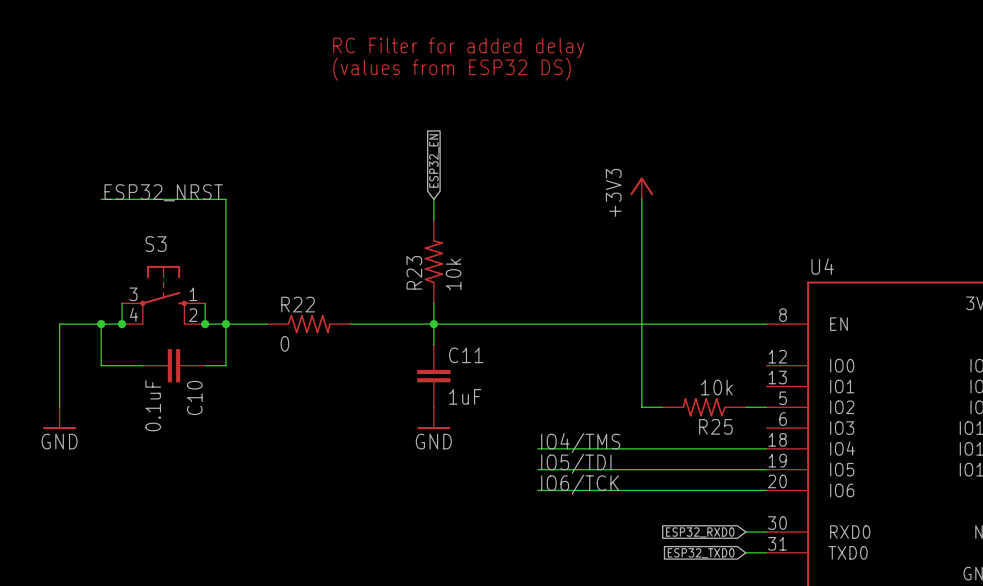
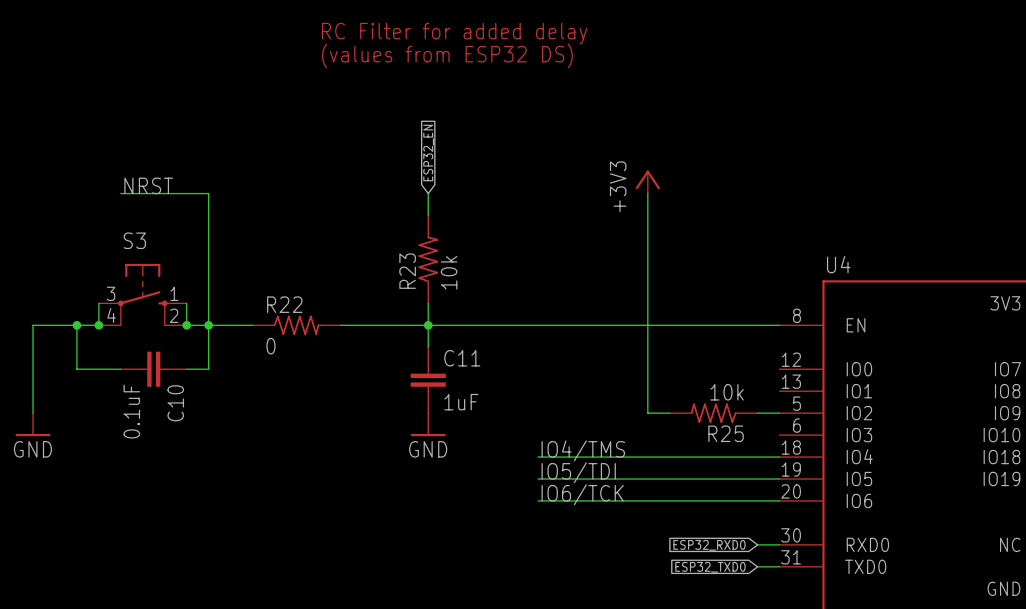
label: ESP32_NRST (163, 192) -> none
label: none -> NRST (148, 185)
wire: (101, 199) (142, 199) -> none

